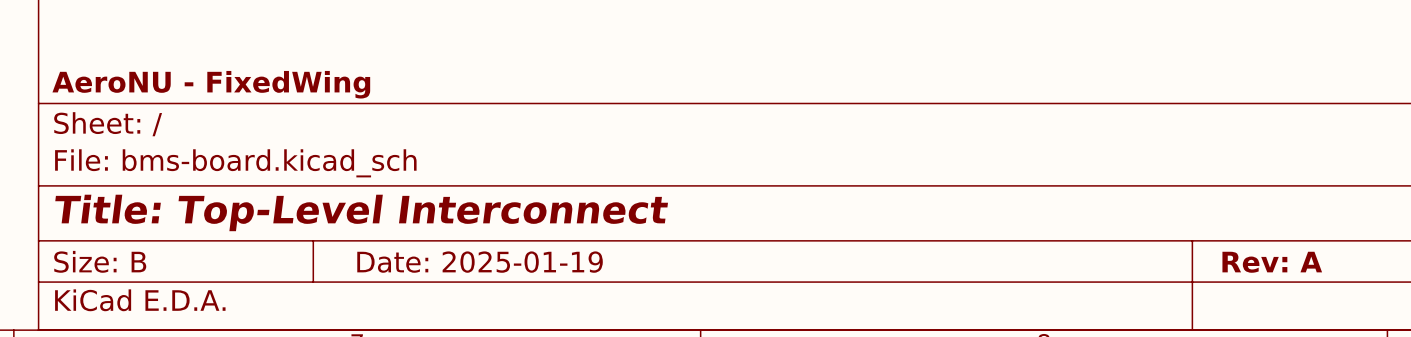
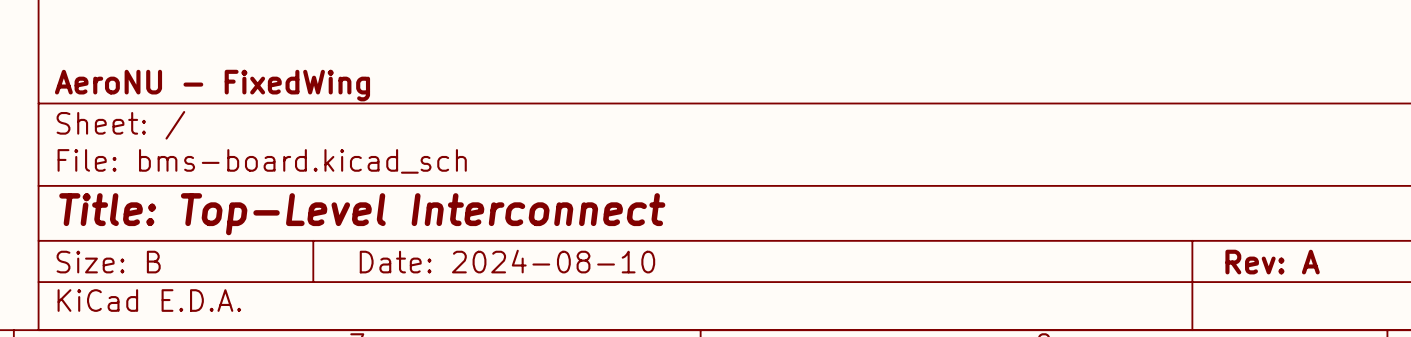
title block: Date: 2025-01-19 (480, 262) -> Date: 2024-08-10 (507, 261)

